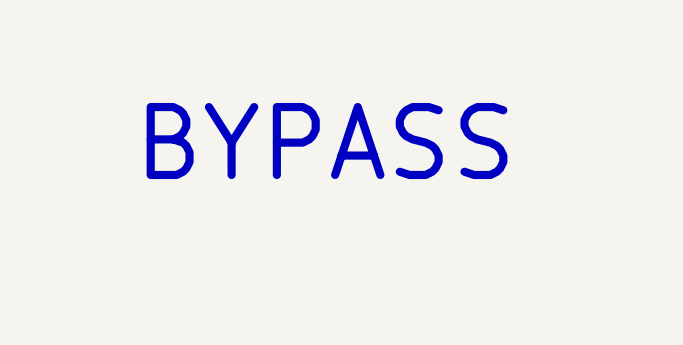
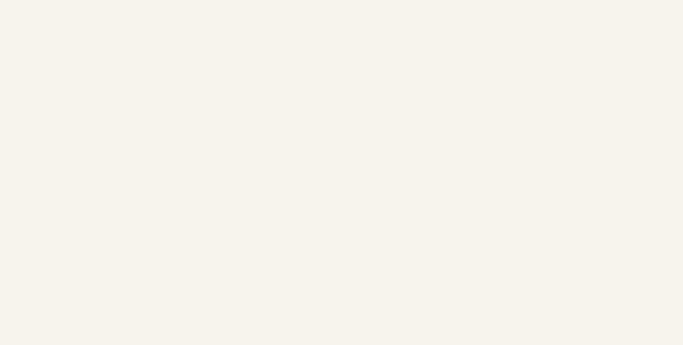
text: BYPASS (327, 141) -> none

